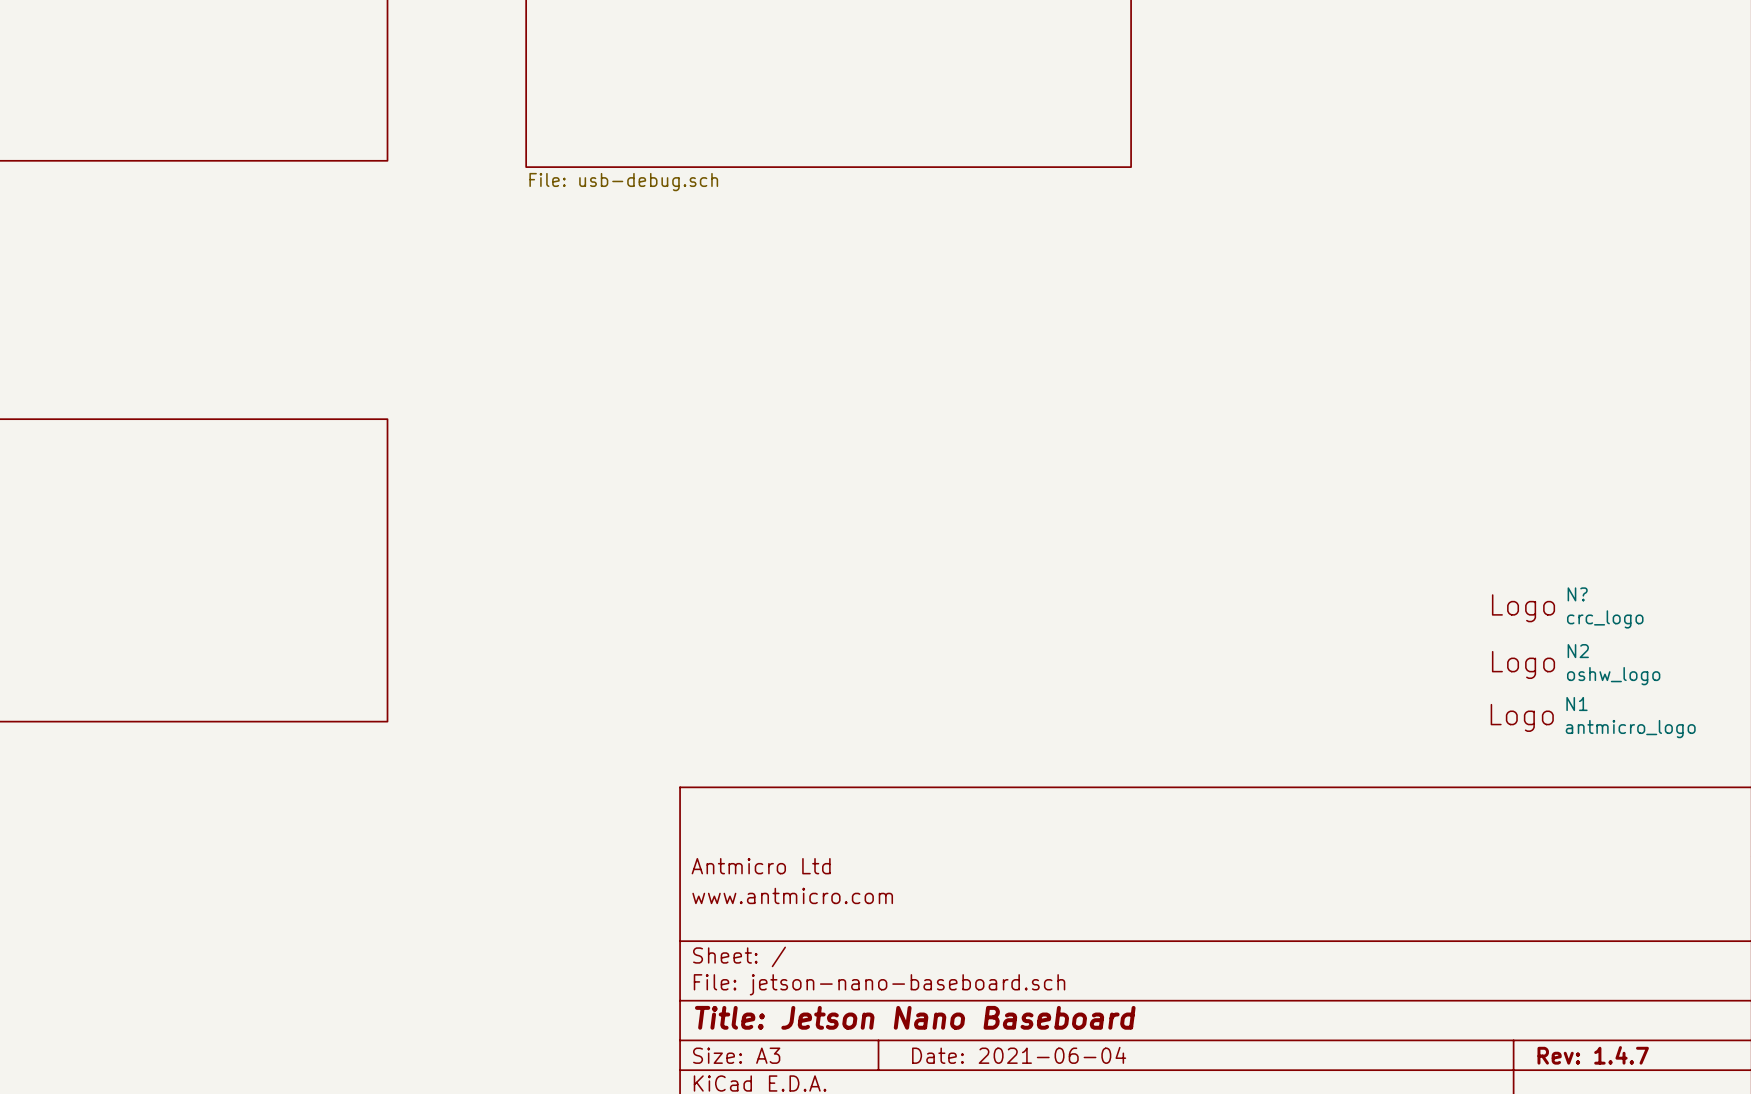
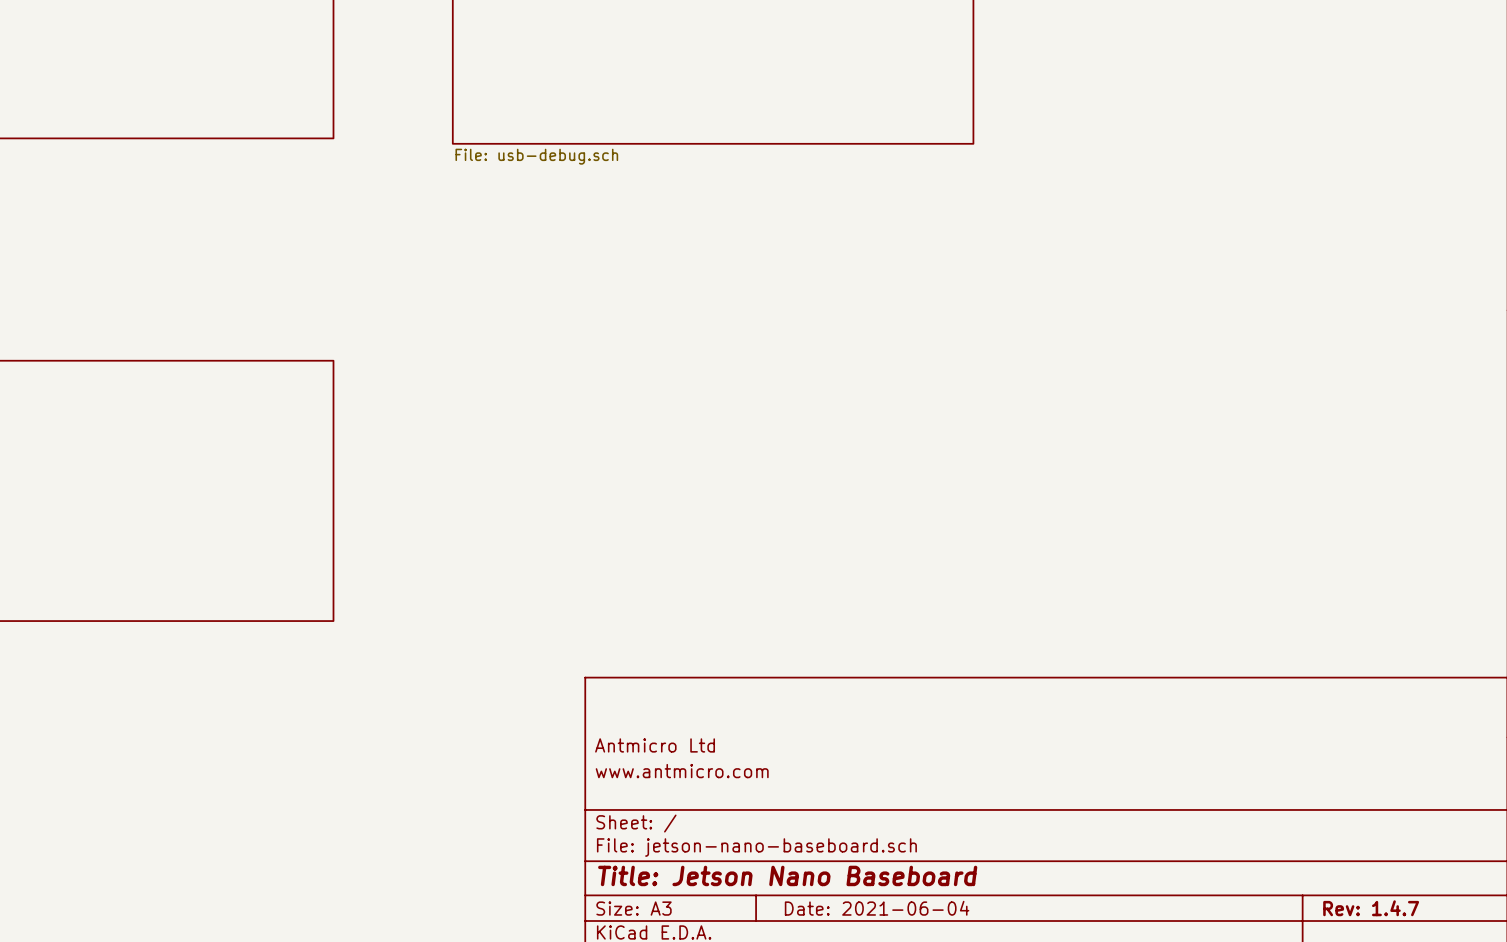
N?: crc_logo (1567, 607) -> none
N2: oshw_logo (1576, 664) -> none
N1: antmicro_logo (1593, 717) -> none

